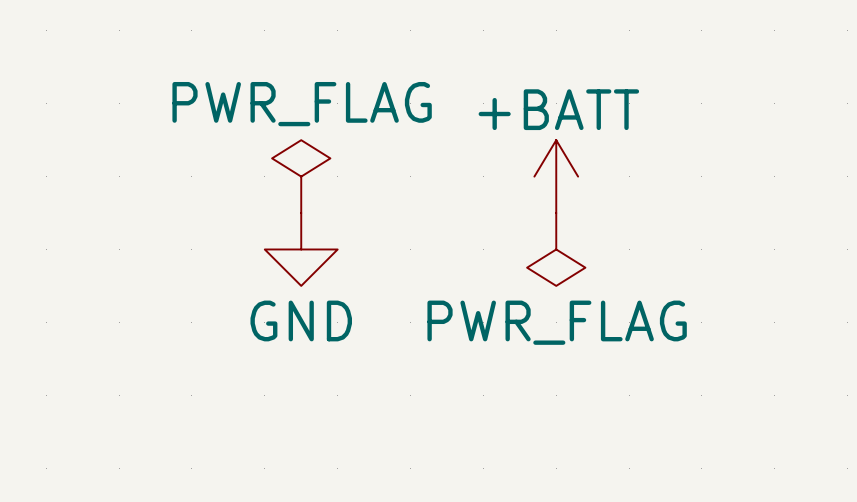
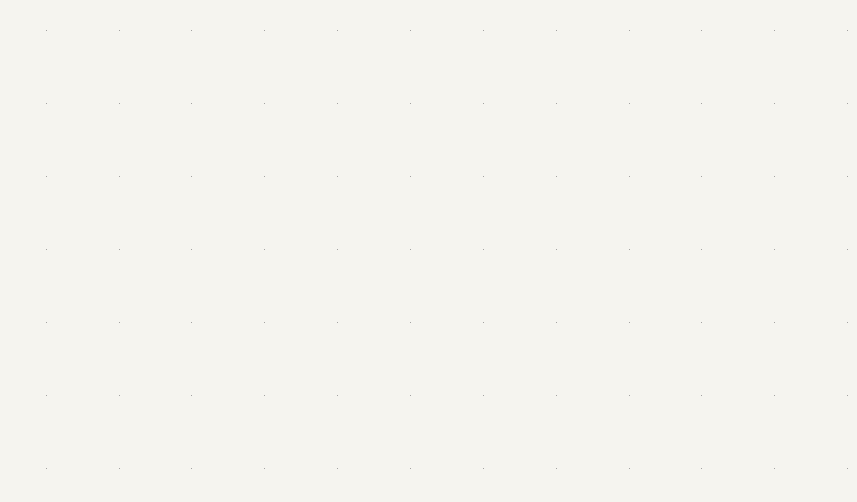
power symbol: PWR_FLAG (301, 176) -> none
power symbol: +BATT (556, 176) -> none
power symbol: GND (301, 249) -> none
power symbol: PWR_FLAG (556, 249) -> none

